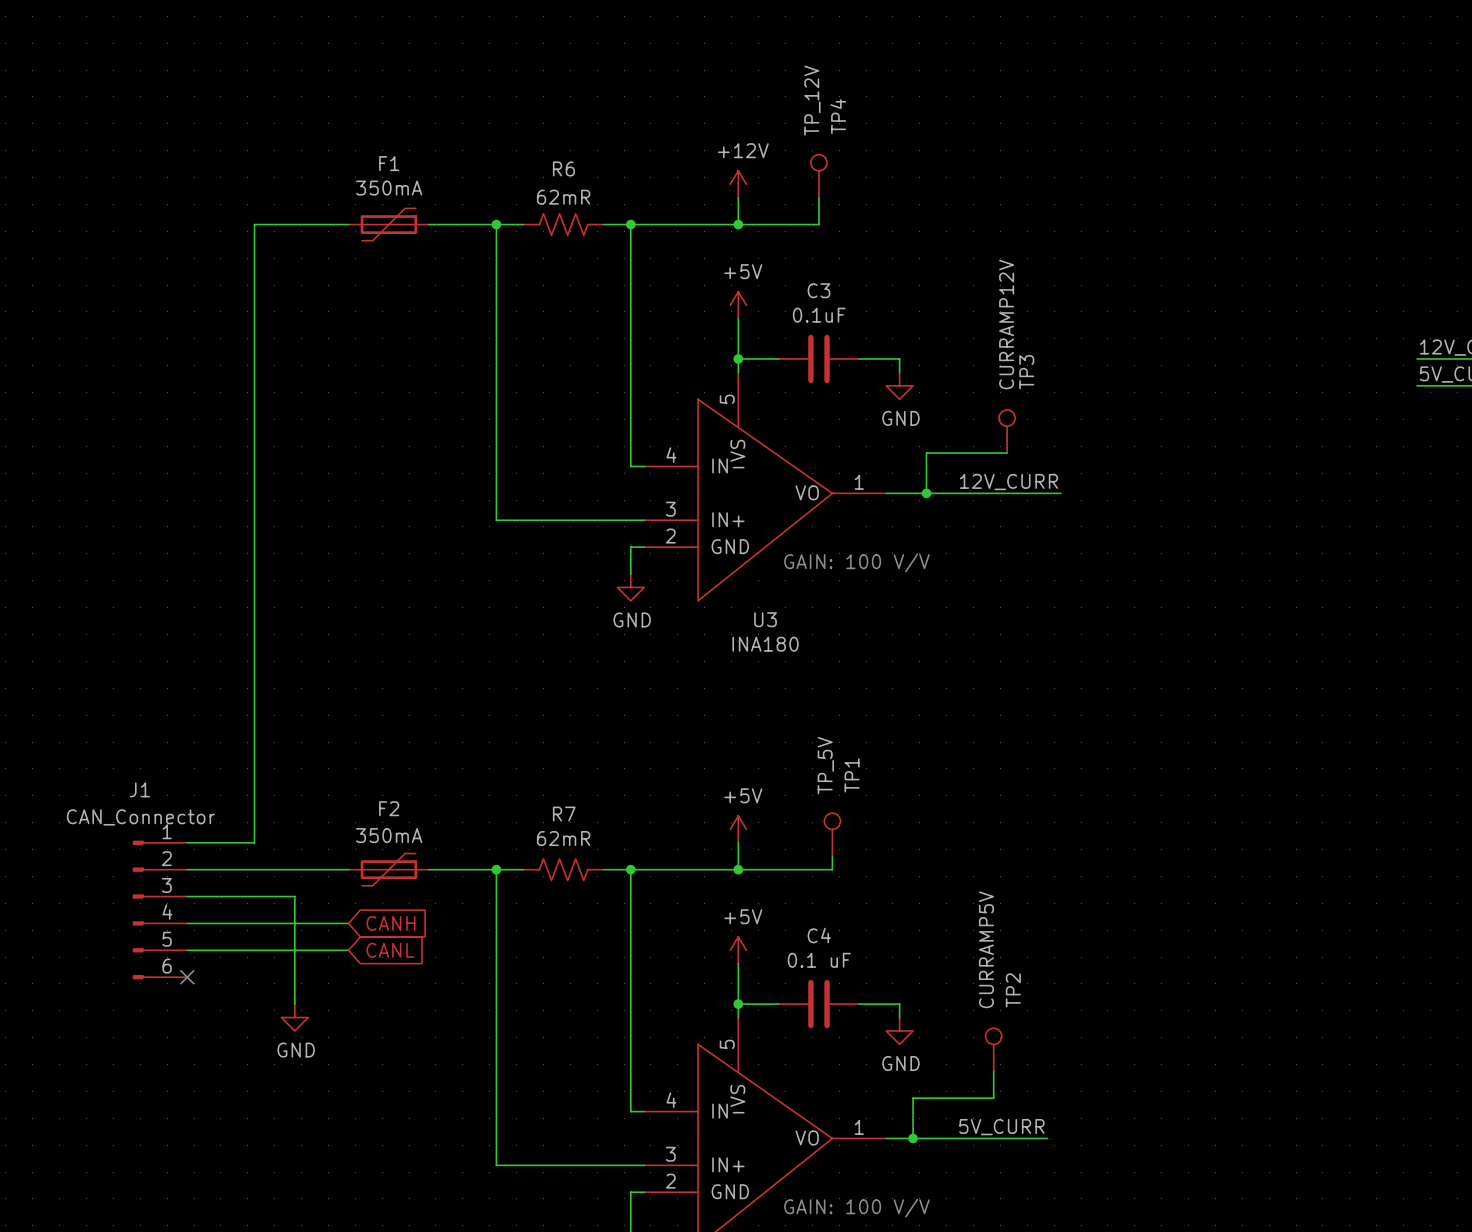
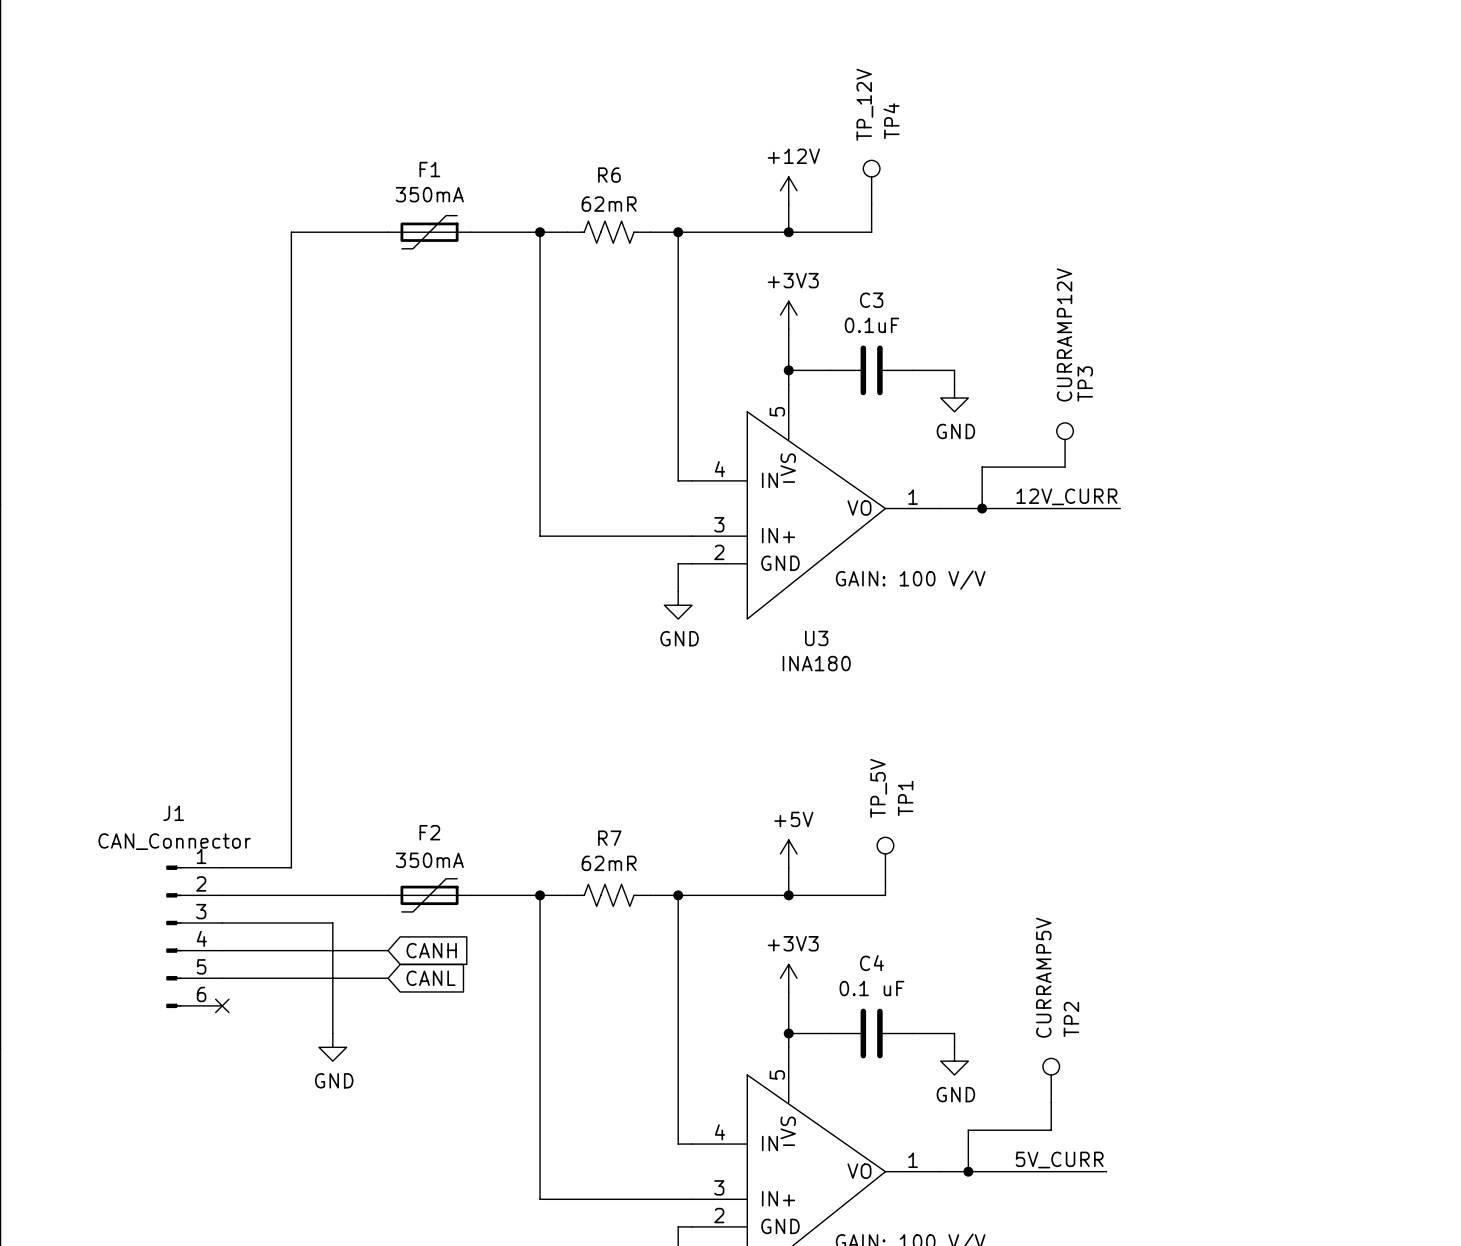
power symbol: +5V (738, 305) -> +3V3 (788, 315)
power symbol: +5V (738, 950) -> +3V3 (788, 978)

